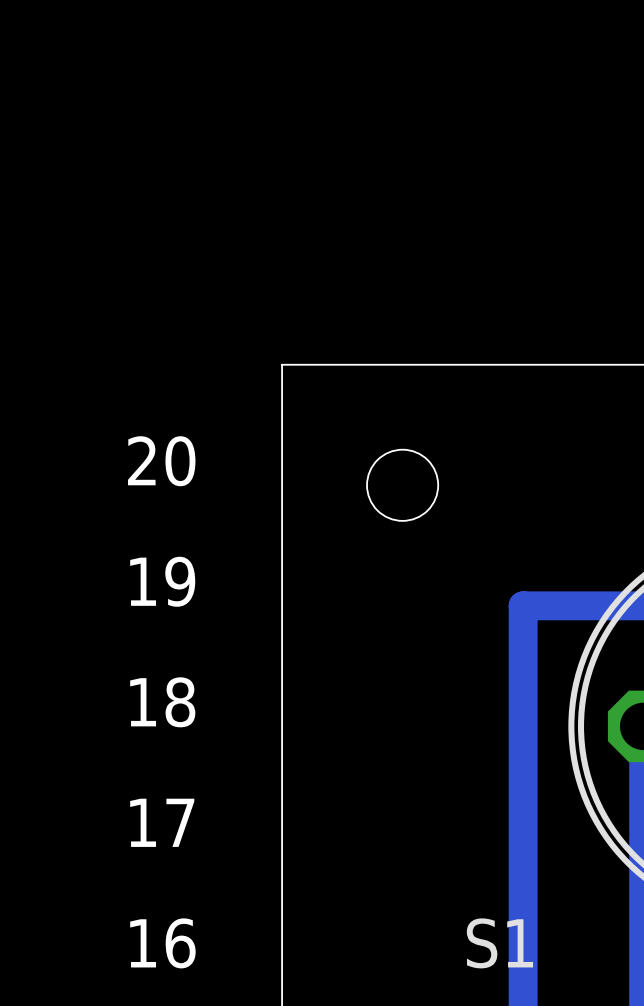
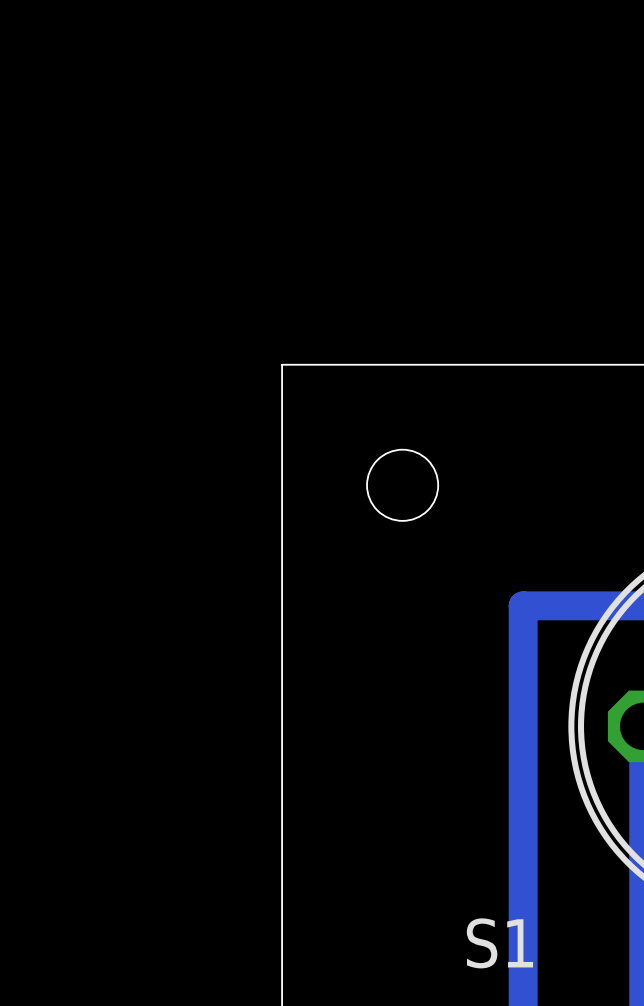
text: 20 (161, 461) -> none
text: 19 (162, 581) -> none
text: 18 (162, 702) -> none
text: 17 (162, 822) -> none
text: 16 (162, 943) -> none

